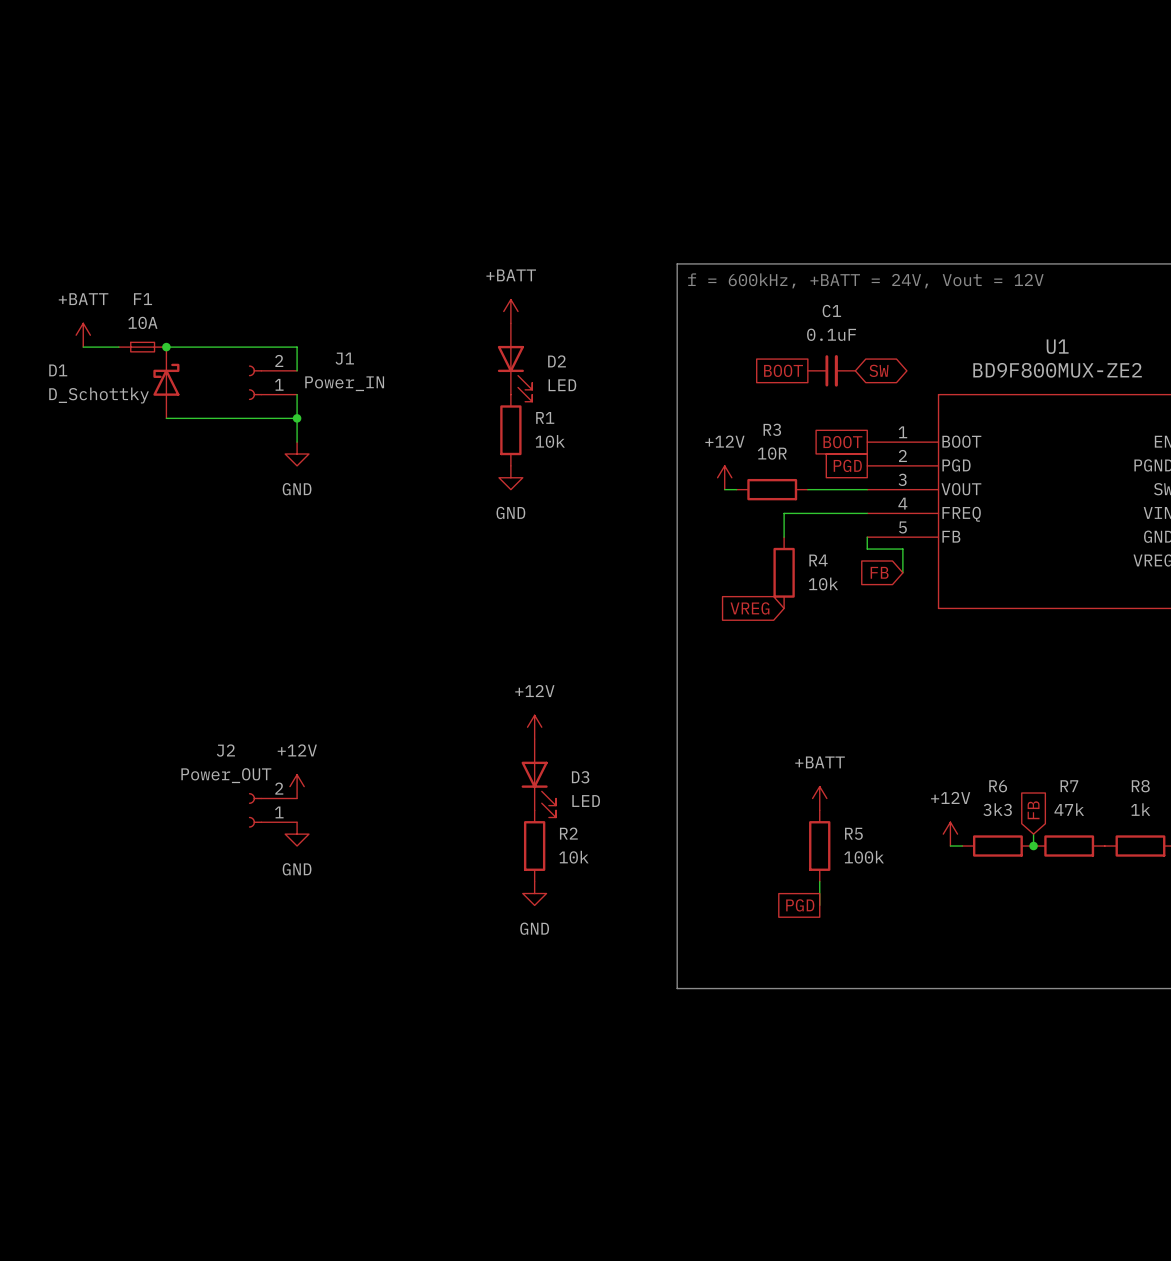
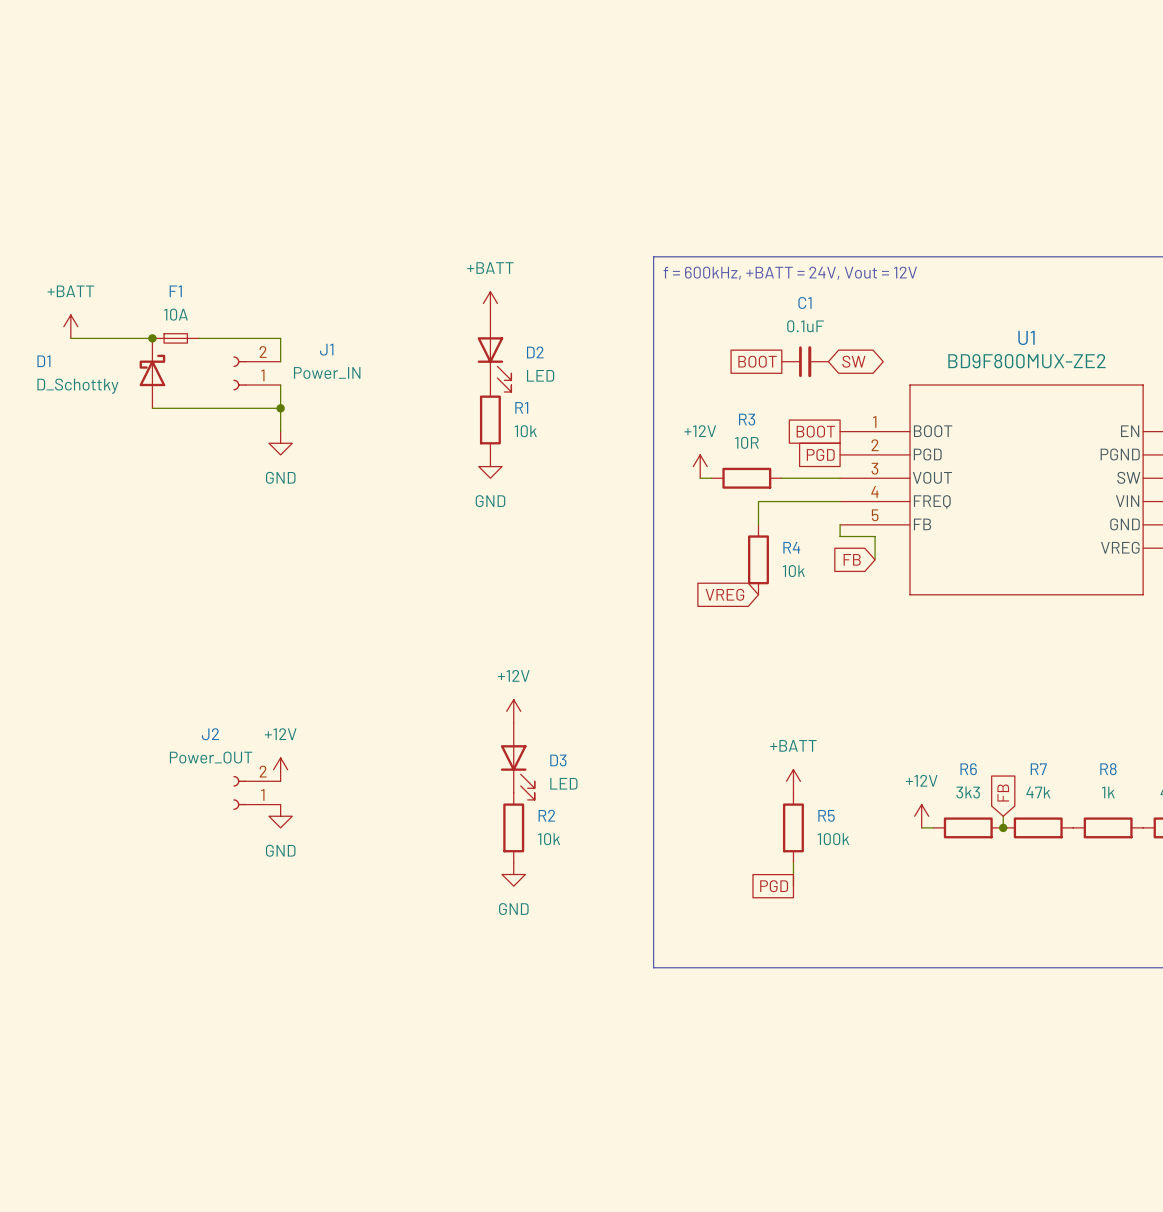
F1 position: (142, 347) -> (175, 338)

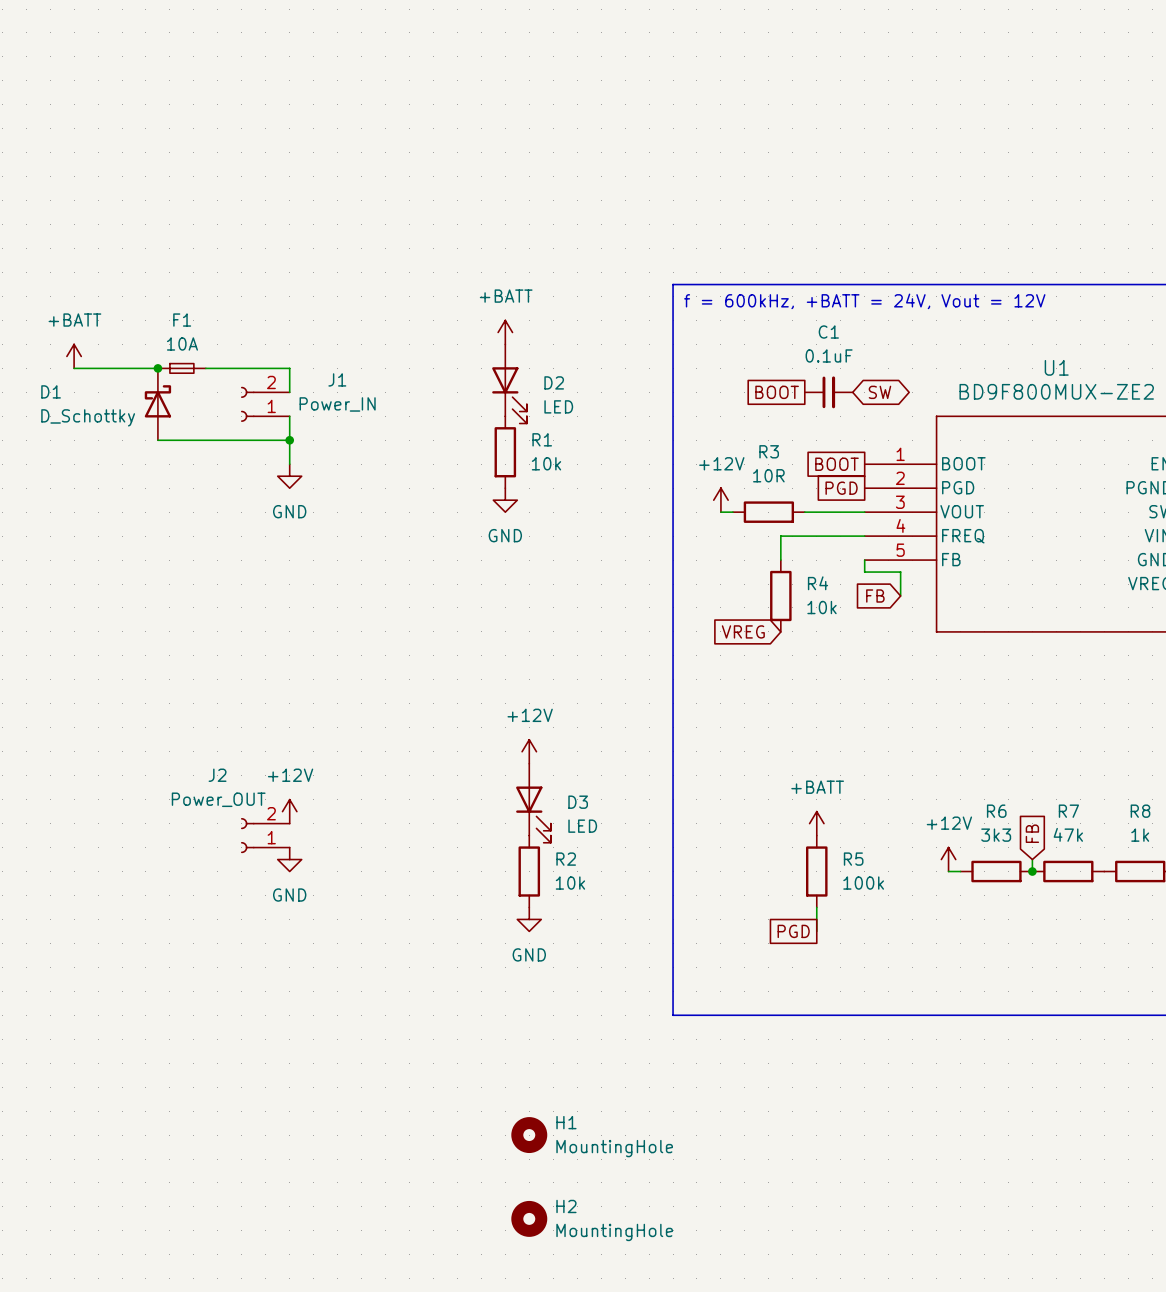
H1: none -> MountingHole (529, 1135)
H2: none -> MountingHole (529, 1218)

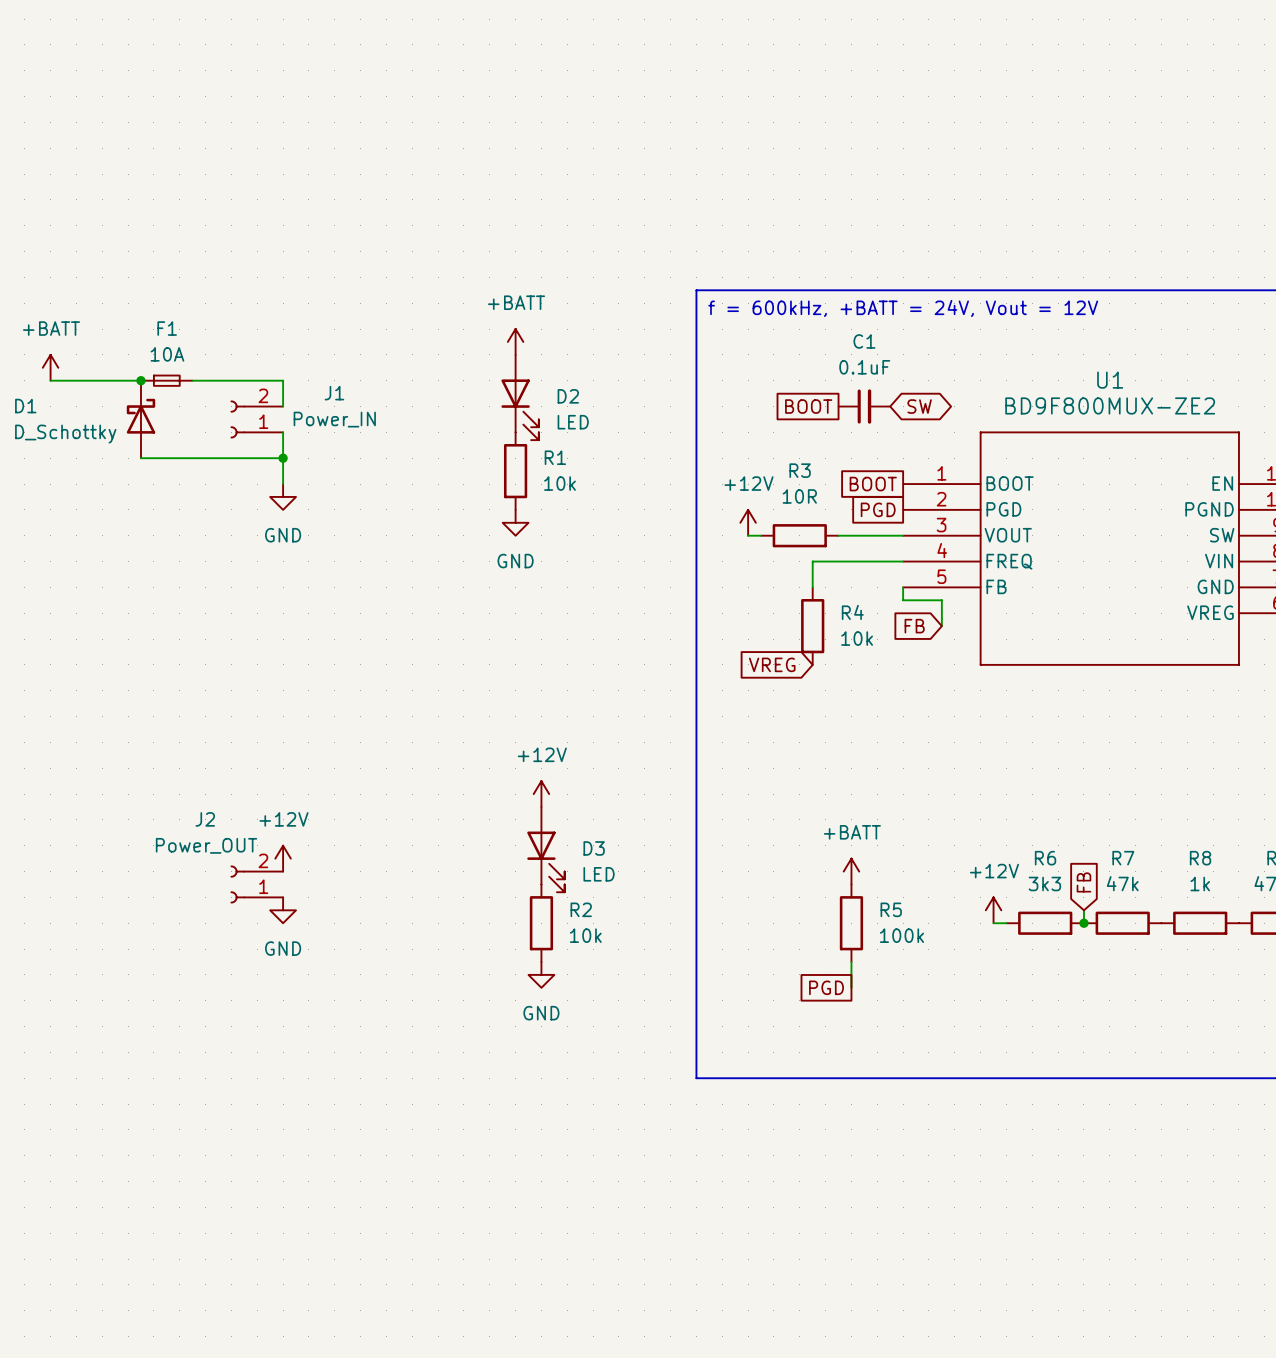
H1: MountingHole (529, 1135) -> none
H2: MountingHole (529, 1218) -> none

